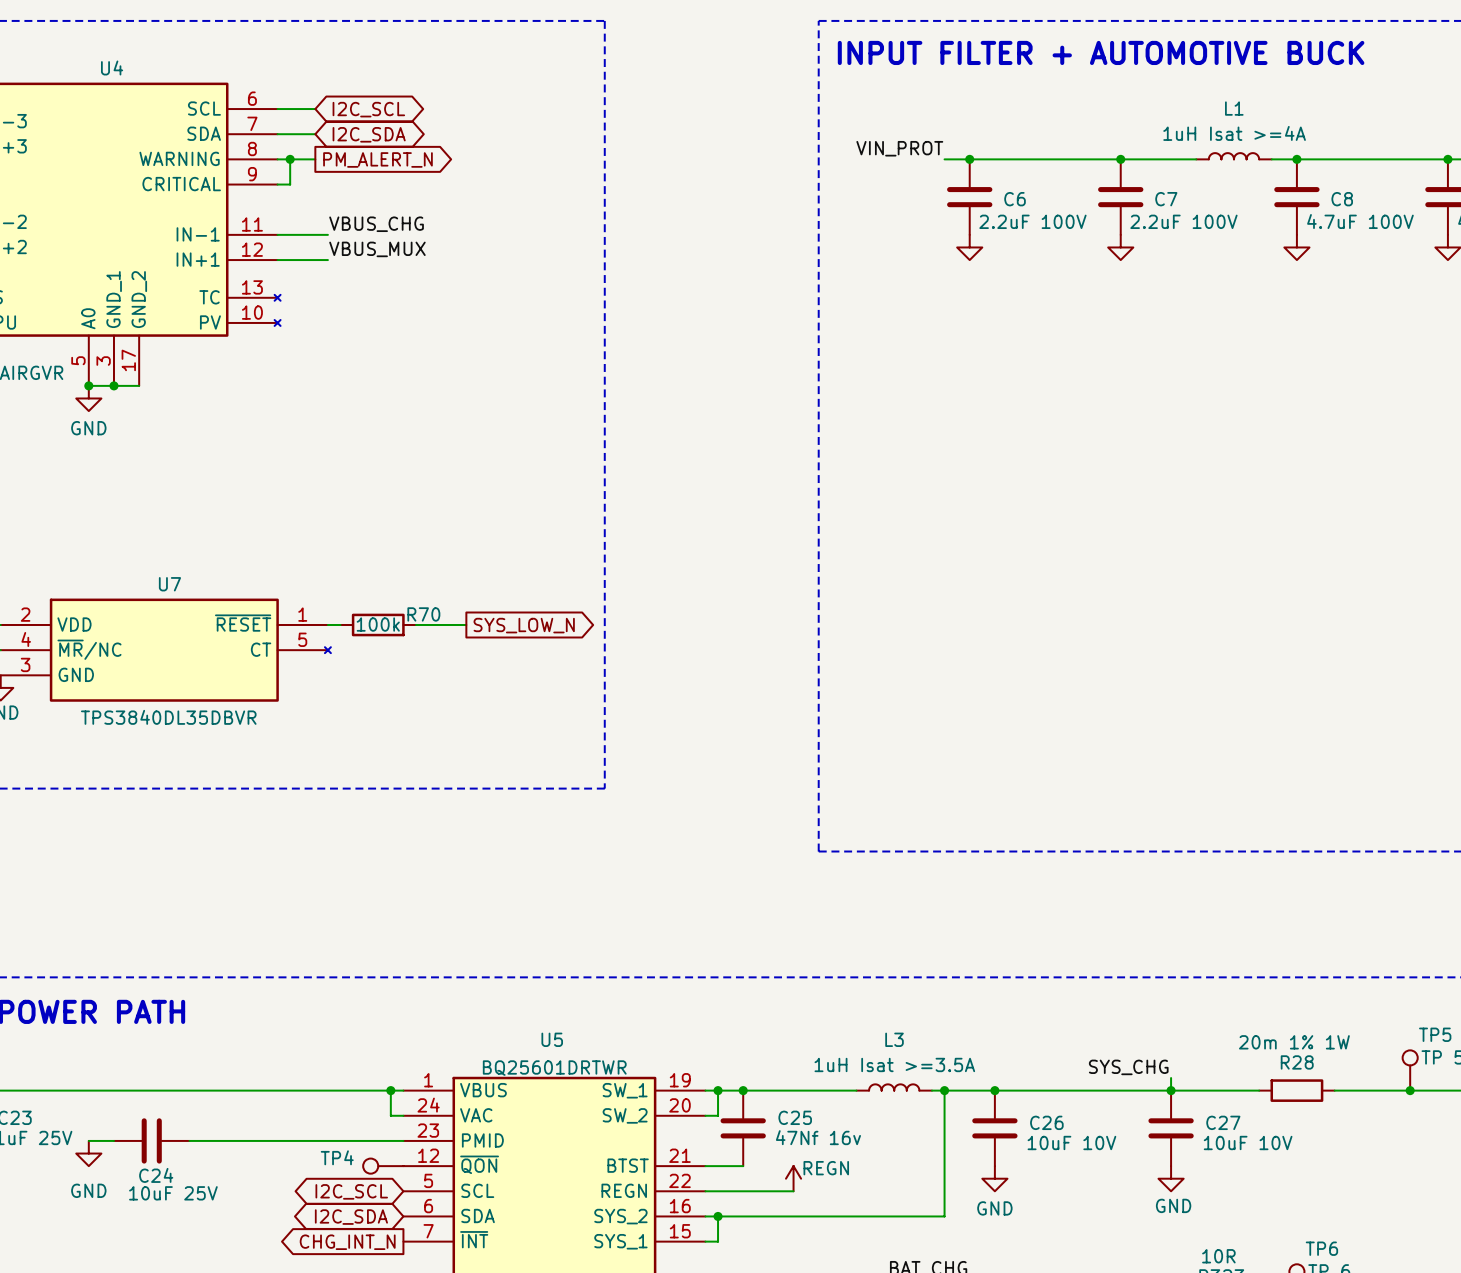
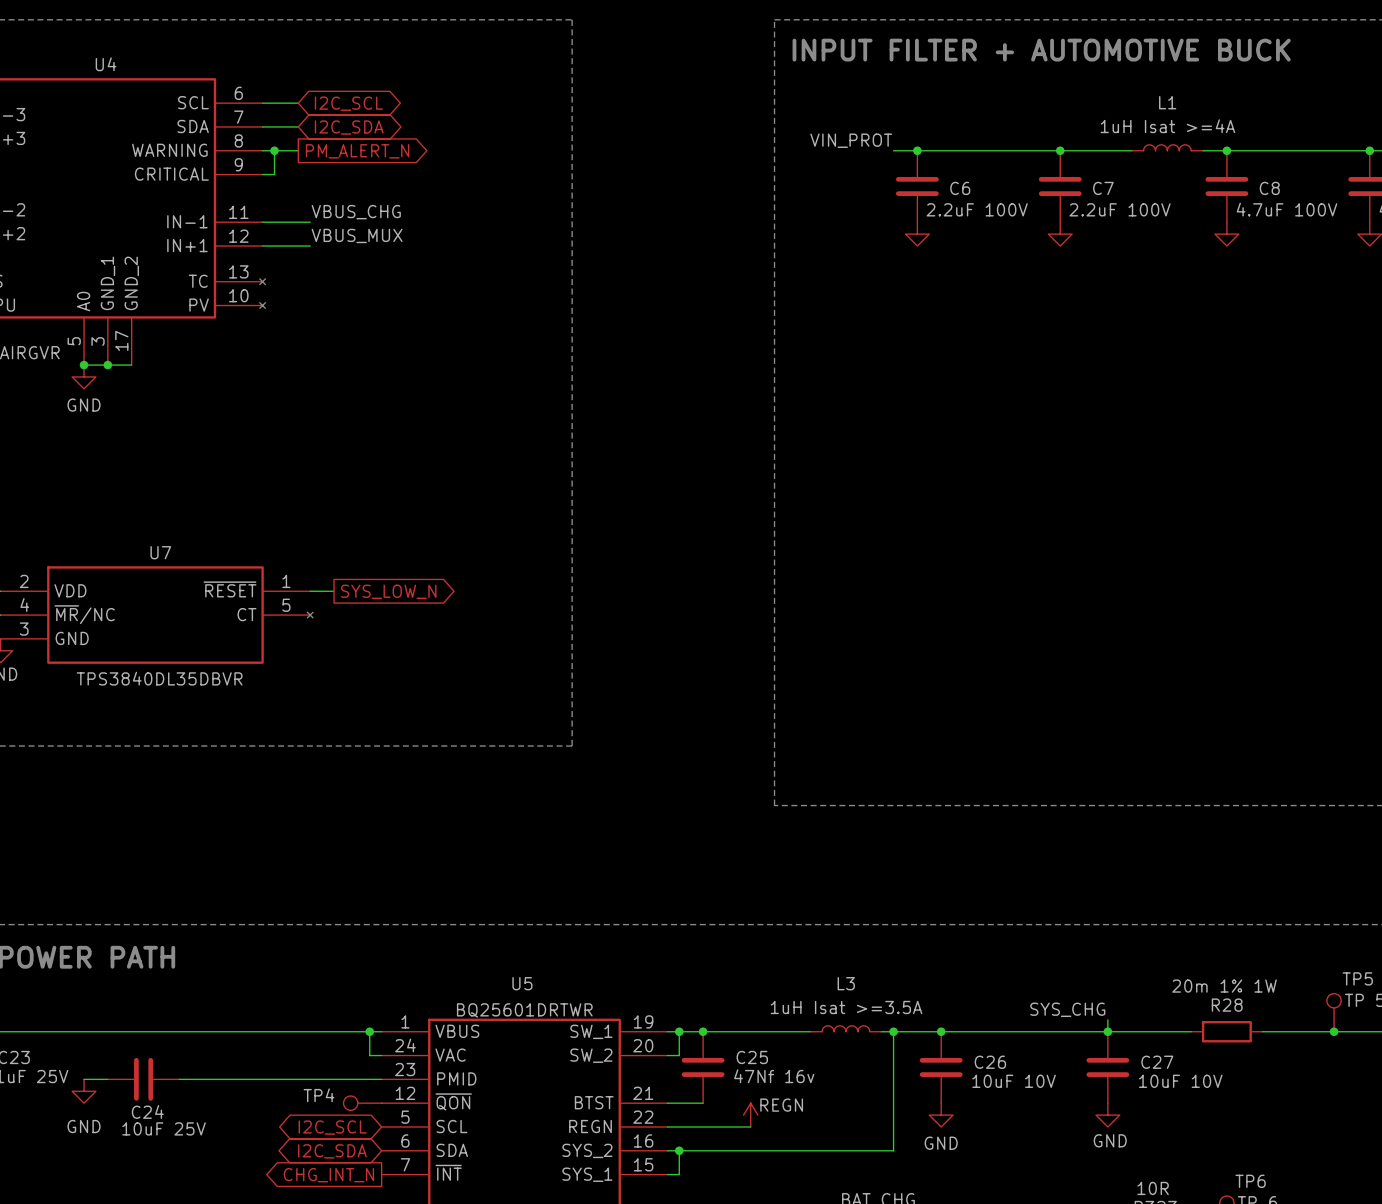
R70: 100k (378, 624) -> none
wire: (416, 624) (466, 624) -> none
global label position: SYS_LOW_N (524, 625) -> SYS_LOW_N (388, 591)

